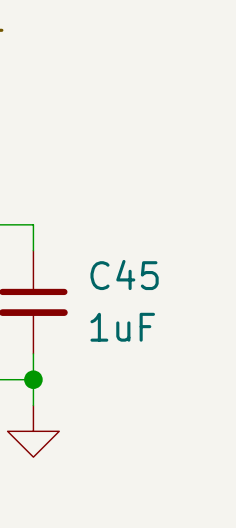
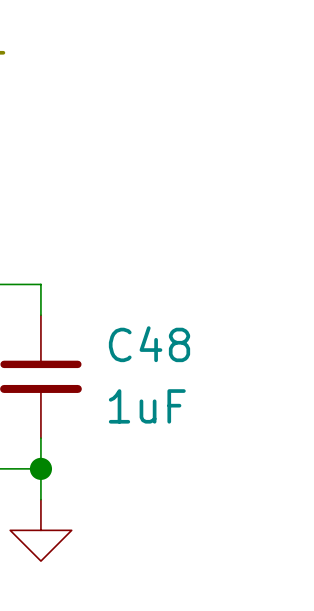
C45 name: C45 (124, 275) -> C48 (149, 344)

